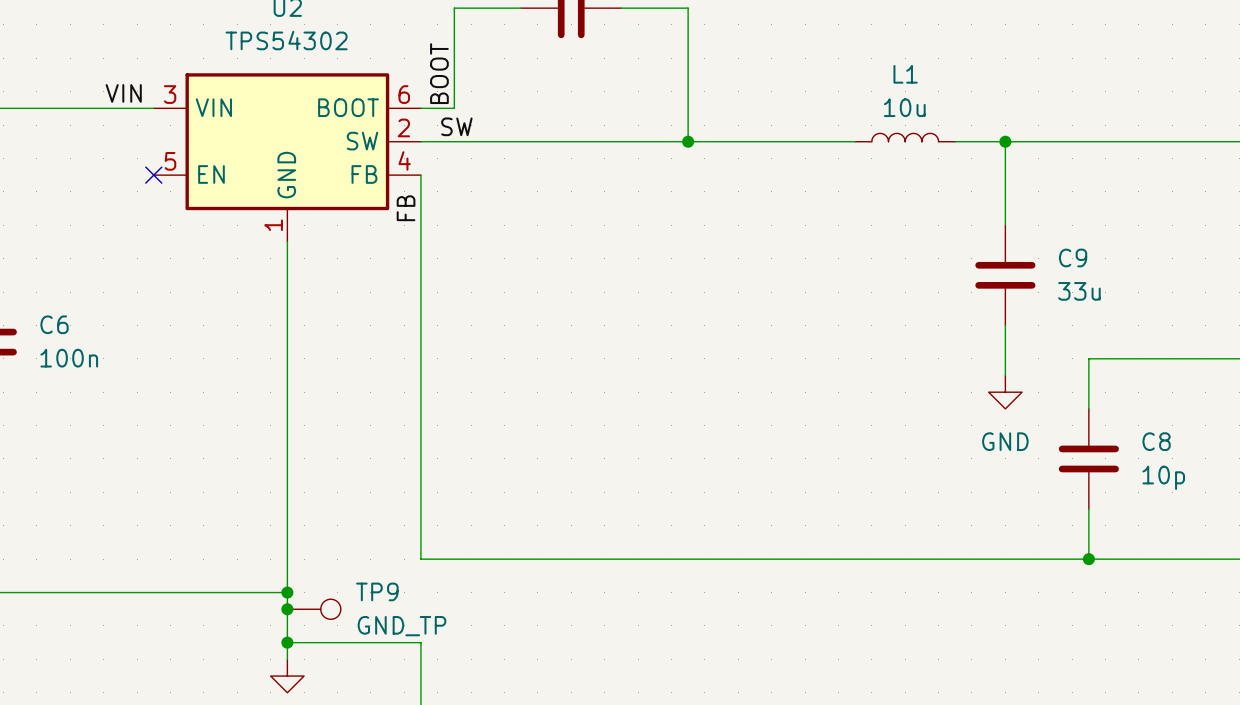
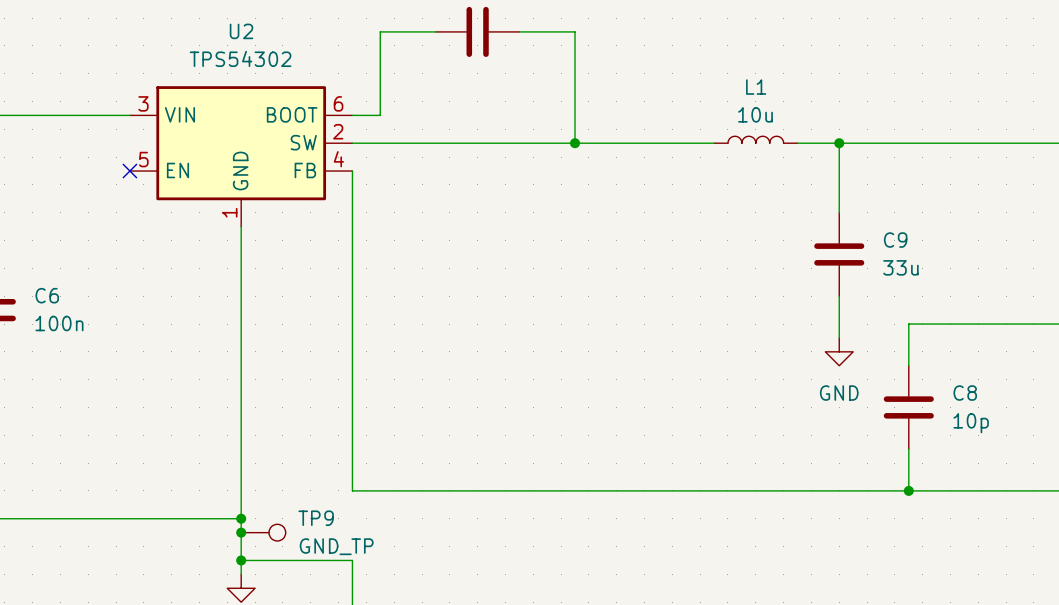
label: BOOT (439, 73) -> none
label: VIN (123, 93) -> none
label: SW (456, 126) -> none
label: FB (406, 208) -> none

